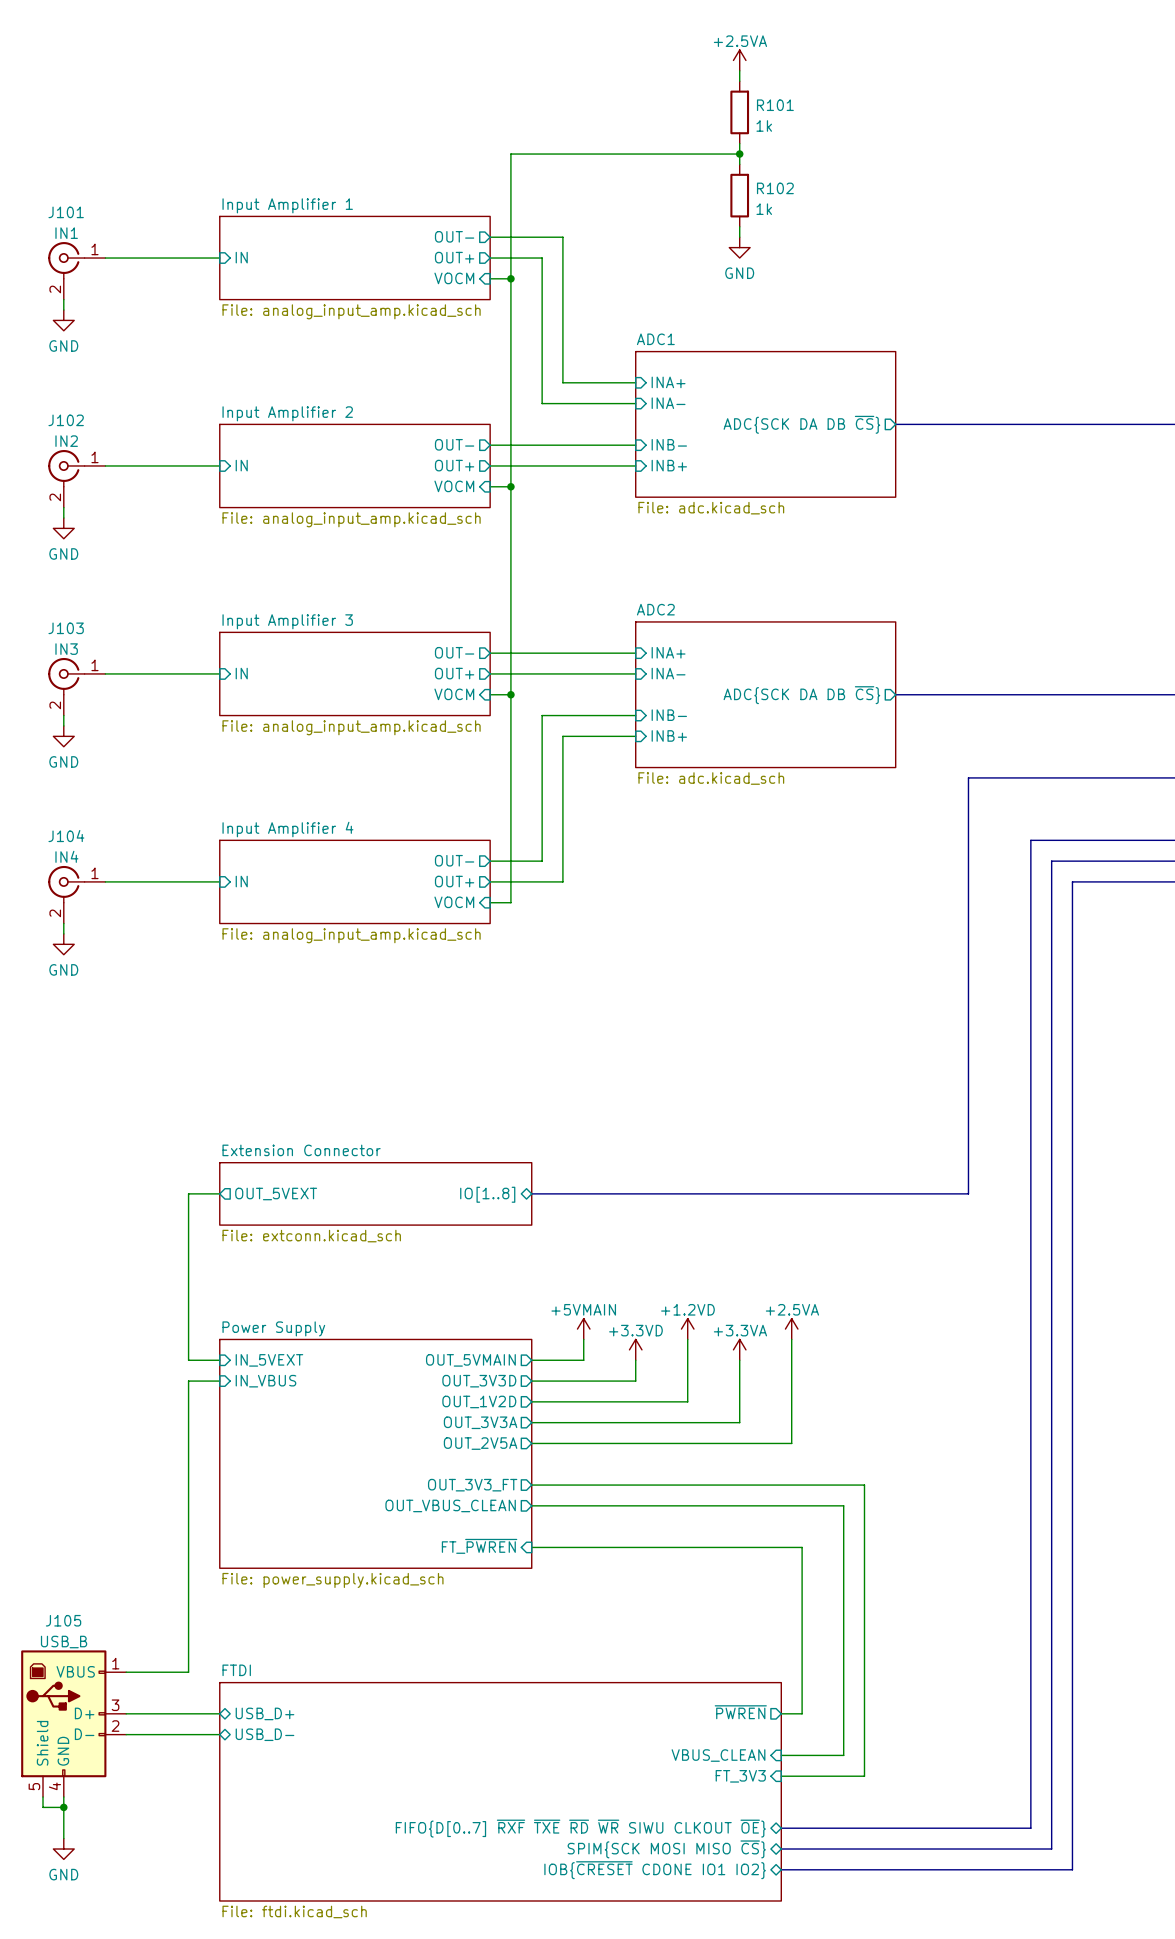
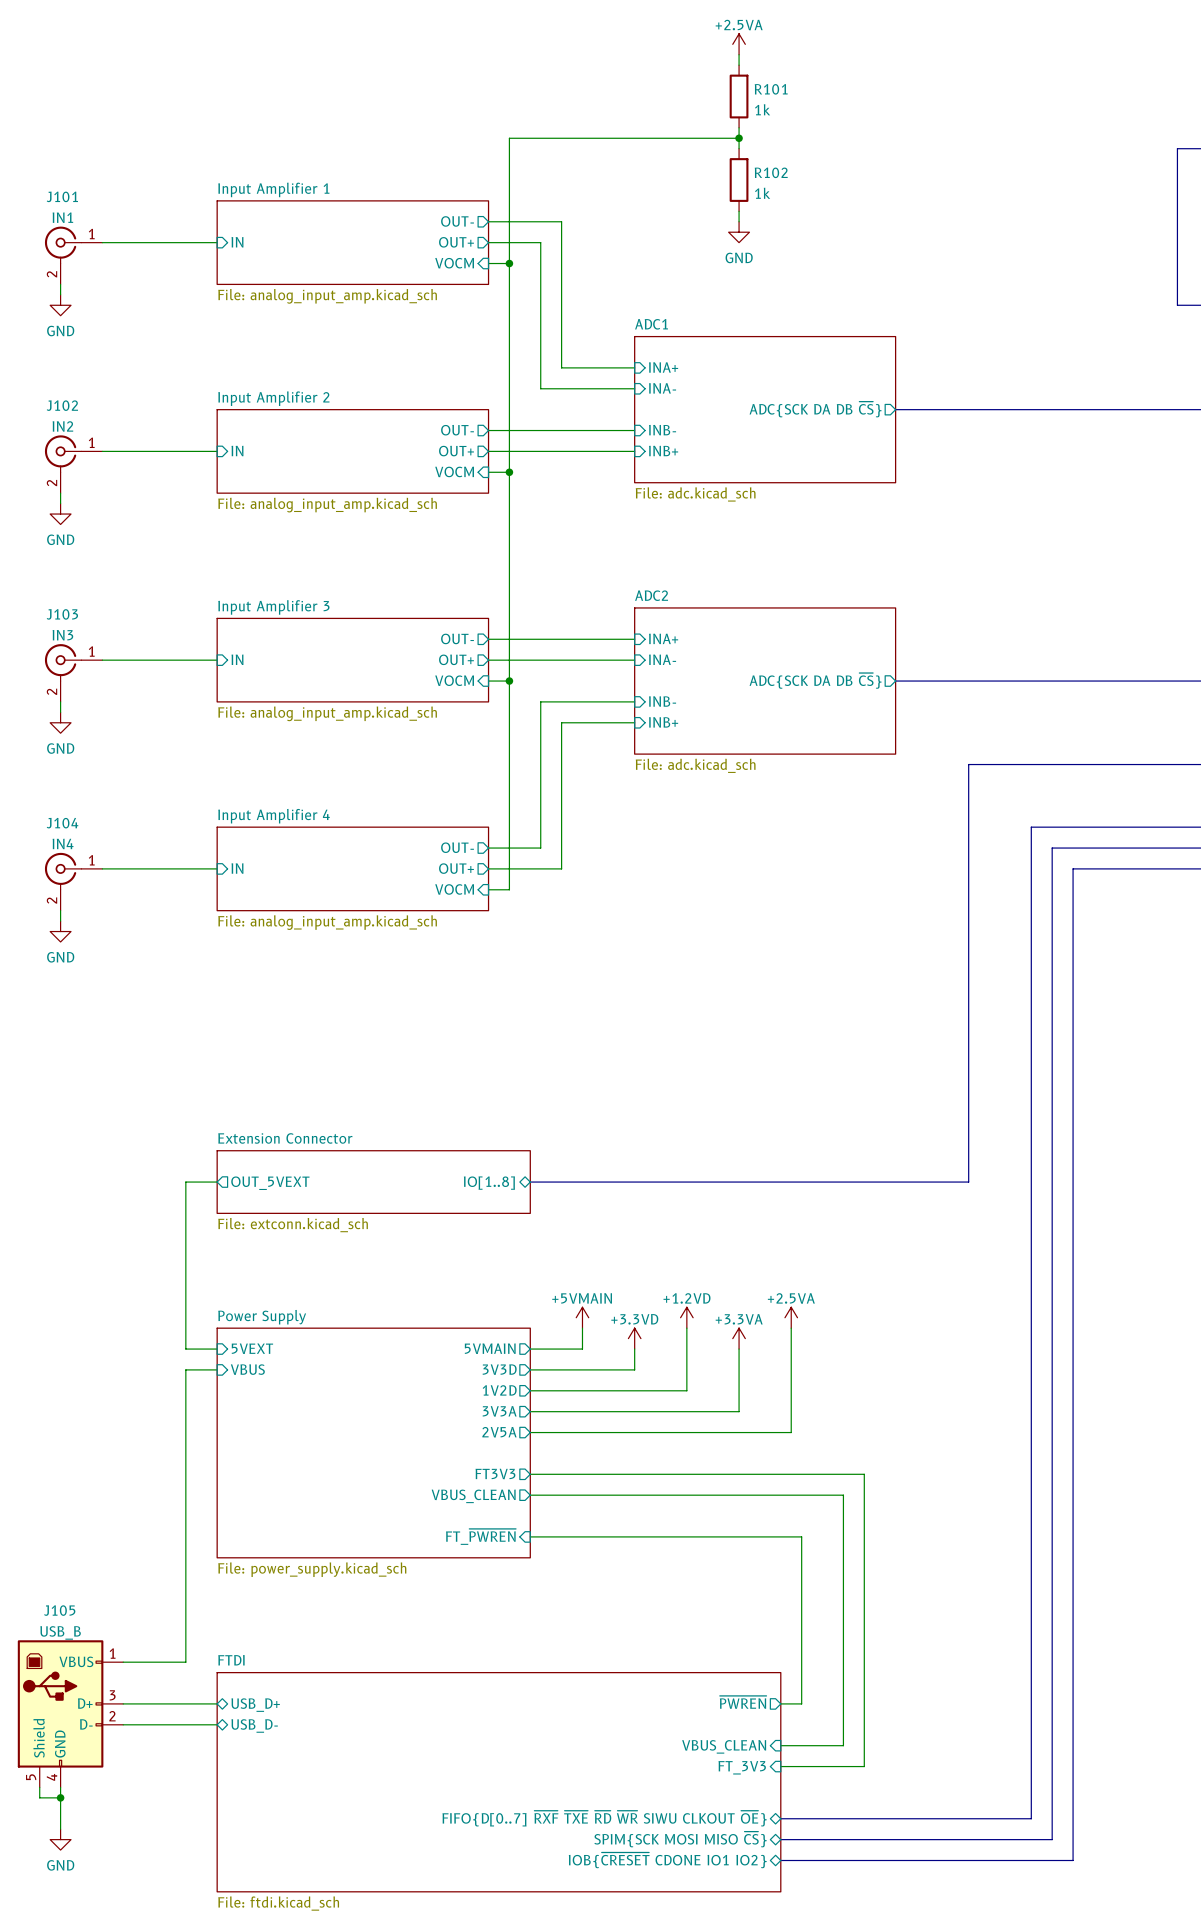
sheet pin: IN_5VEXT (269, 1360) -> 5VEXT (252, 1348)
sheet pin: OUT_5VMAIN (470, 1360) -> 5VMAIN (490, 1348)
sheet pin: IN_VBUS (265, 1381) -> VBUS (247, 1369)
sheet pin: OUT_3V3D (479, 1381) -> 3V3D (499, 1369)
sheet pin: OUT_1V2D (479, 1401) -> 1V2D (499, 1390)
sheet pin: OUT_3V3A (480, 1422) -> 3V3A (499, 1411)
sheet pin: OUT_2V5A (480, 1443) -> 2V5A (499, 1432)
sheet pin: OUT_3V3_FT (472, 1485) -> FT3V3 (495, 1473)
sheet pin: OUT_VBUS_CLEAN (450, 1505) -> VBUS_CLEAN (473, 1496)

